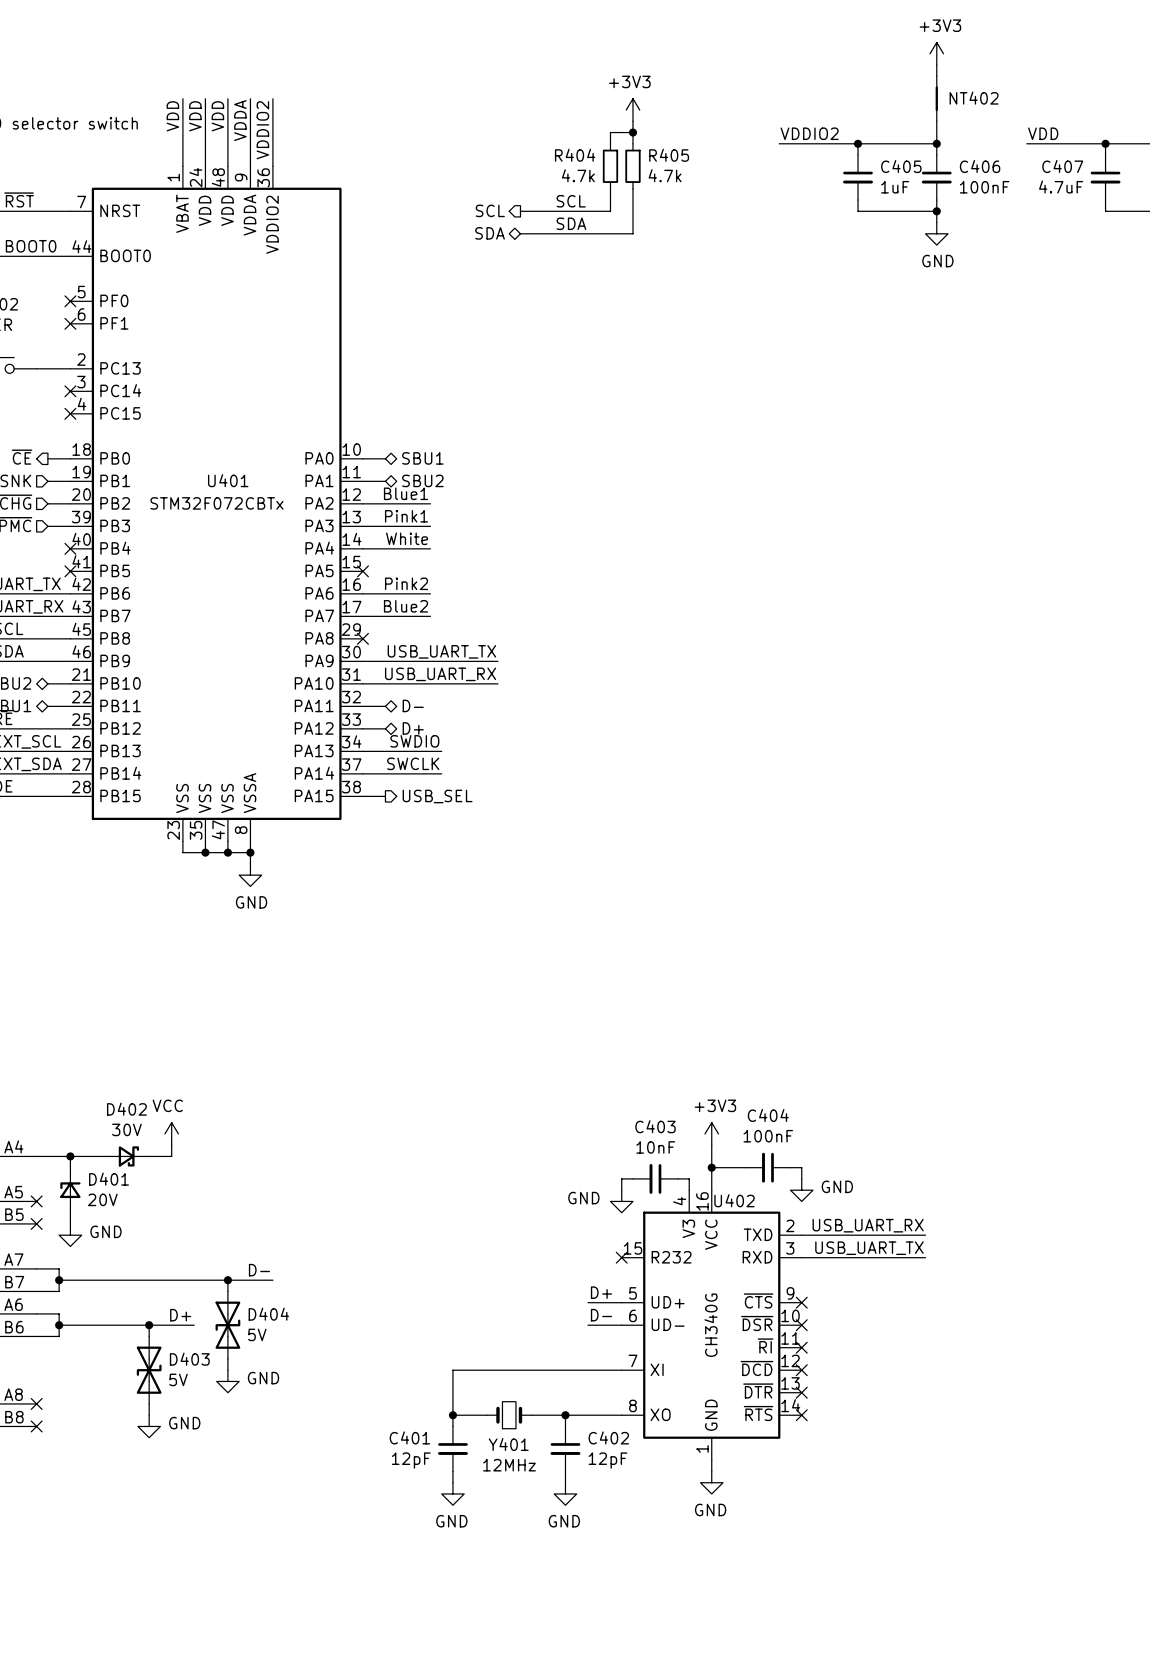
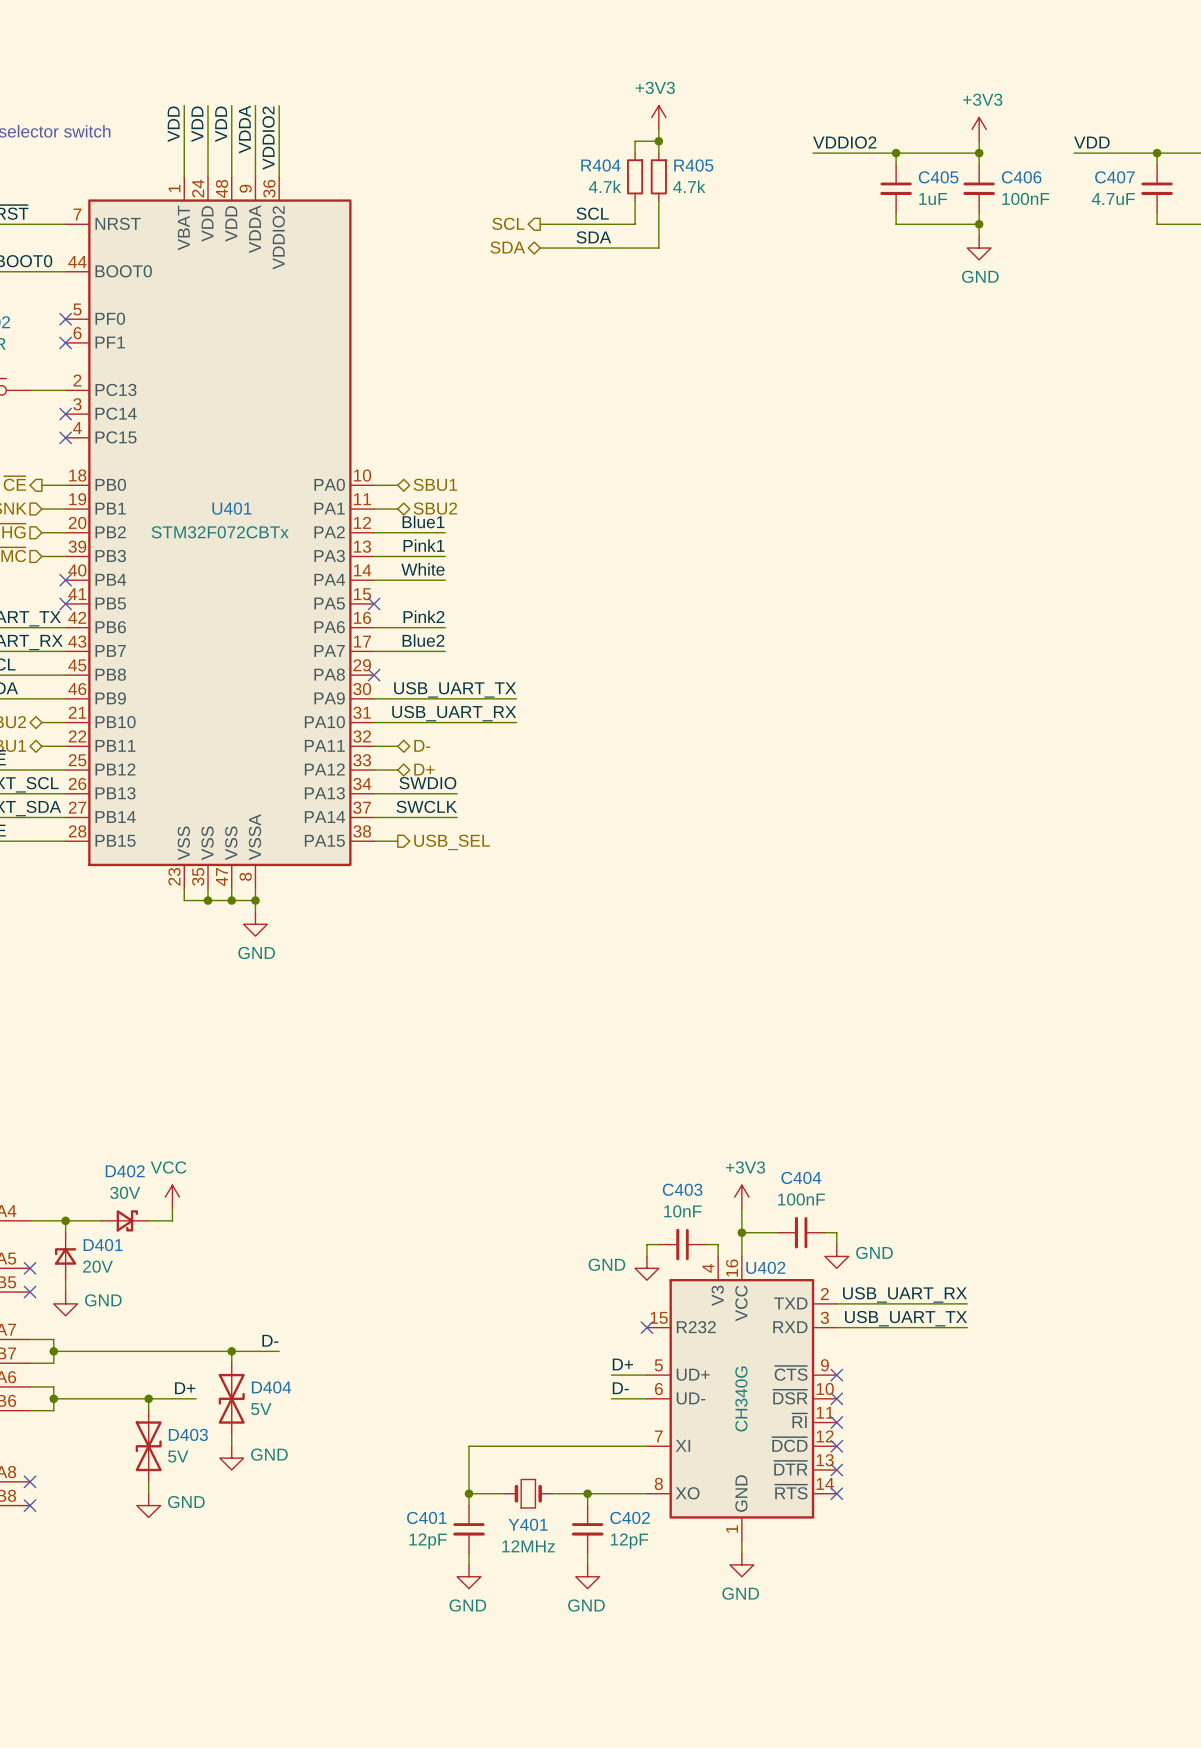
power symbol position: +3V3 (936, 53) -> +3V3 (979, 129)
wire: (936, 65) (936, 76) -> none
NT402: (936, 98) -> none

